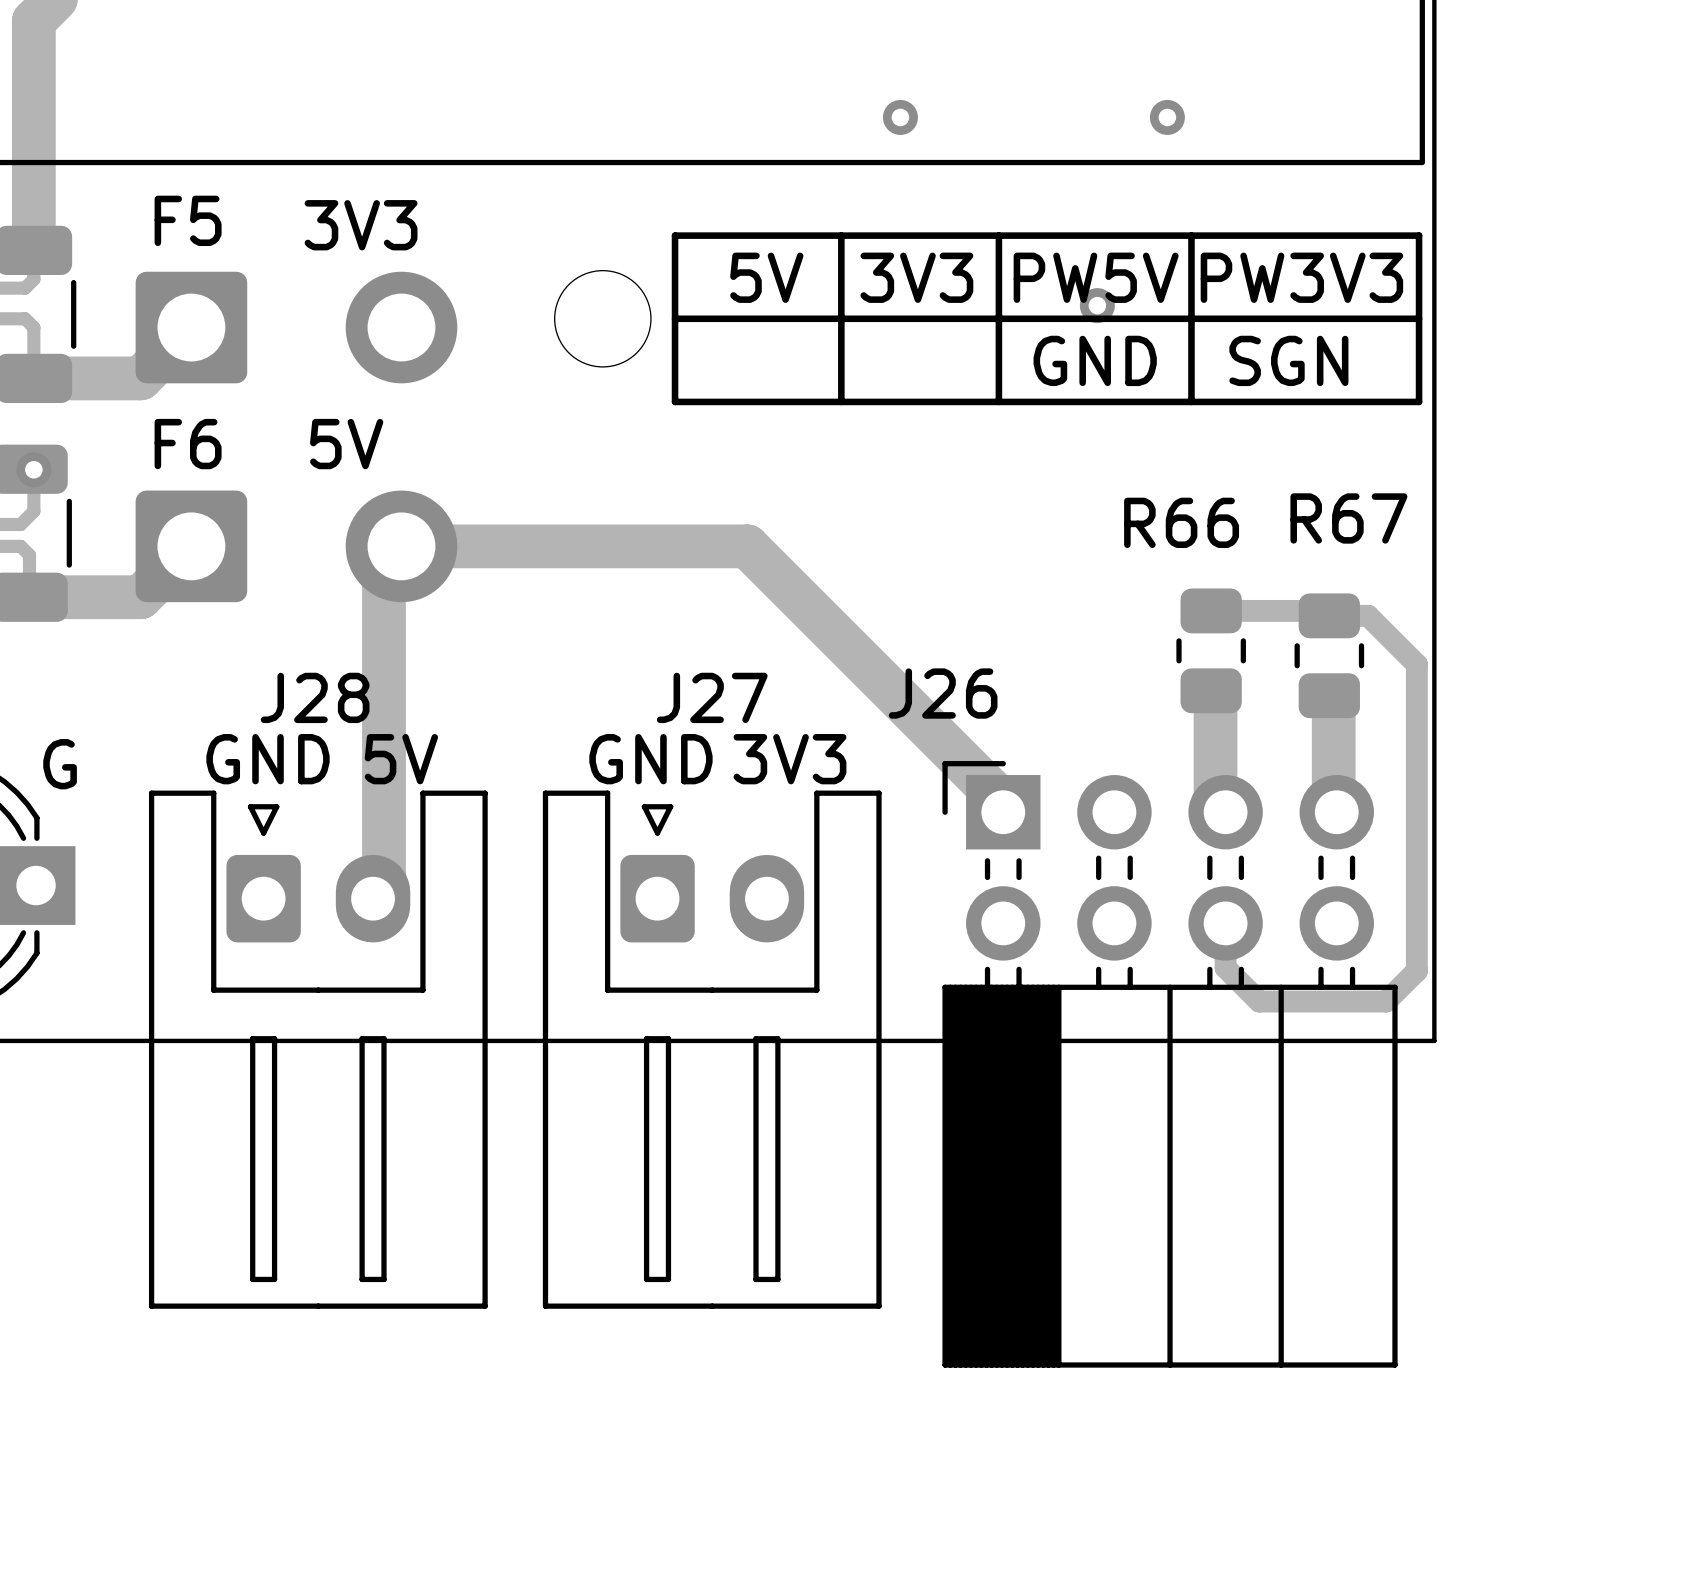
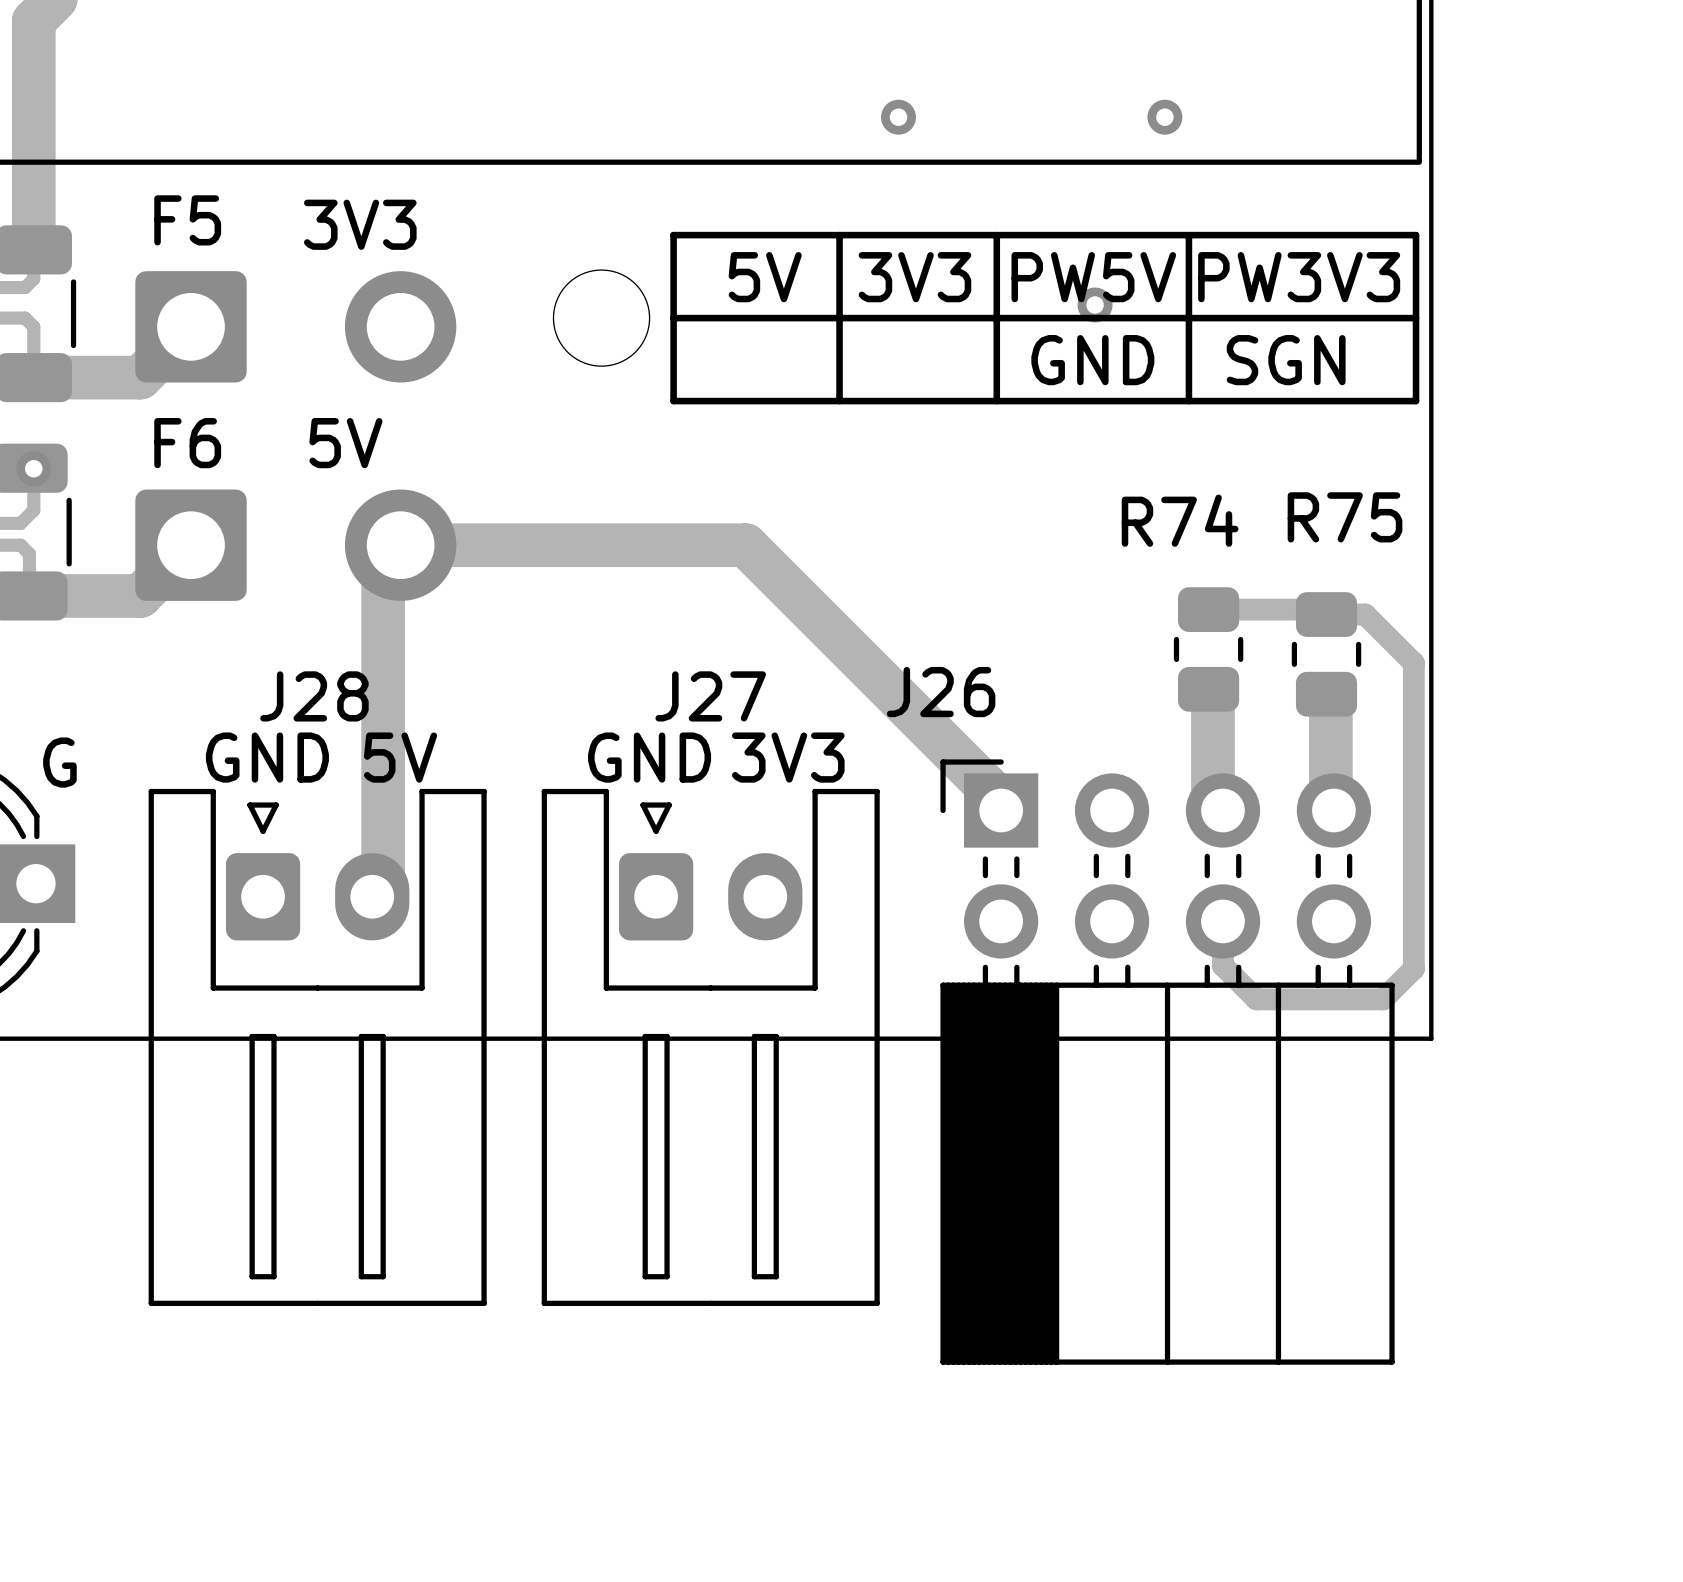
R67 name: R67 (1348, 518) -> R75 (1345, 517)
R66 name: R66 (1181, 522) -> R74 (1180, 520)

